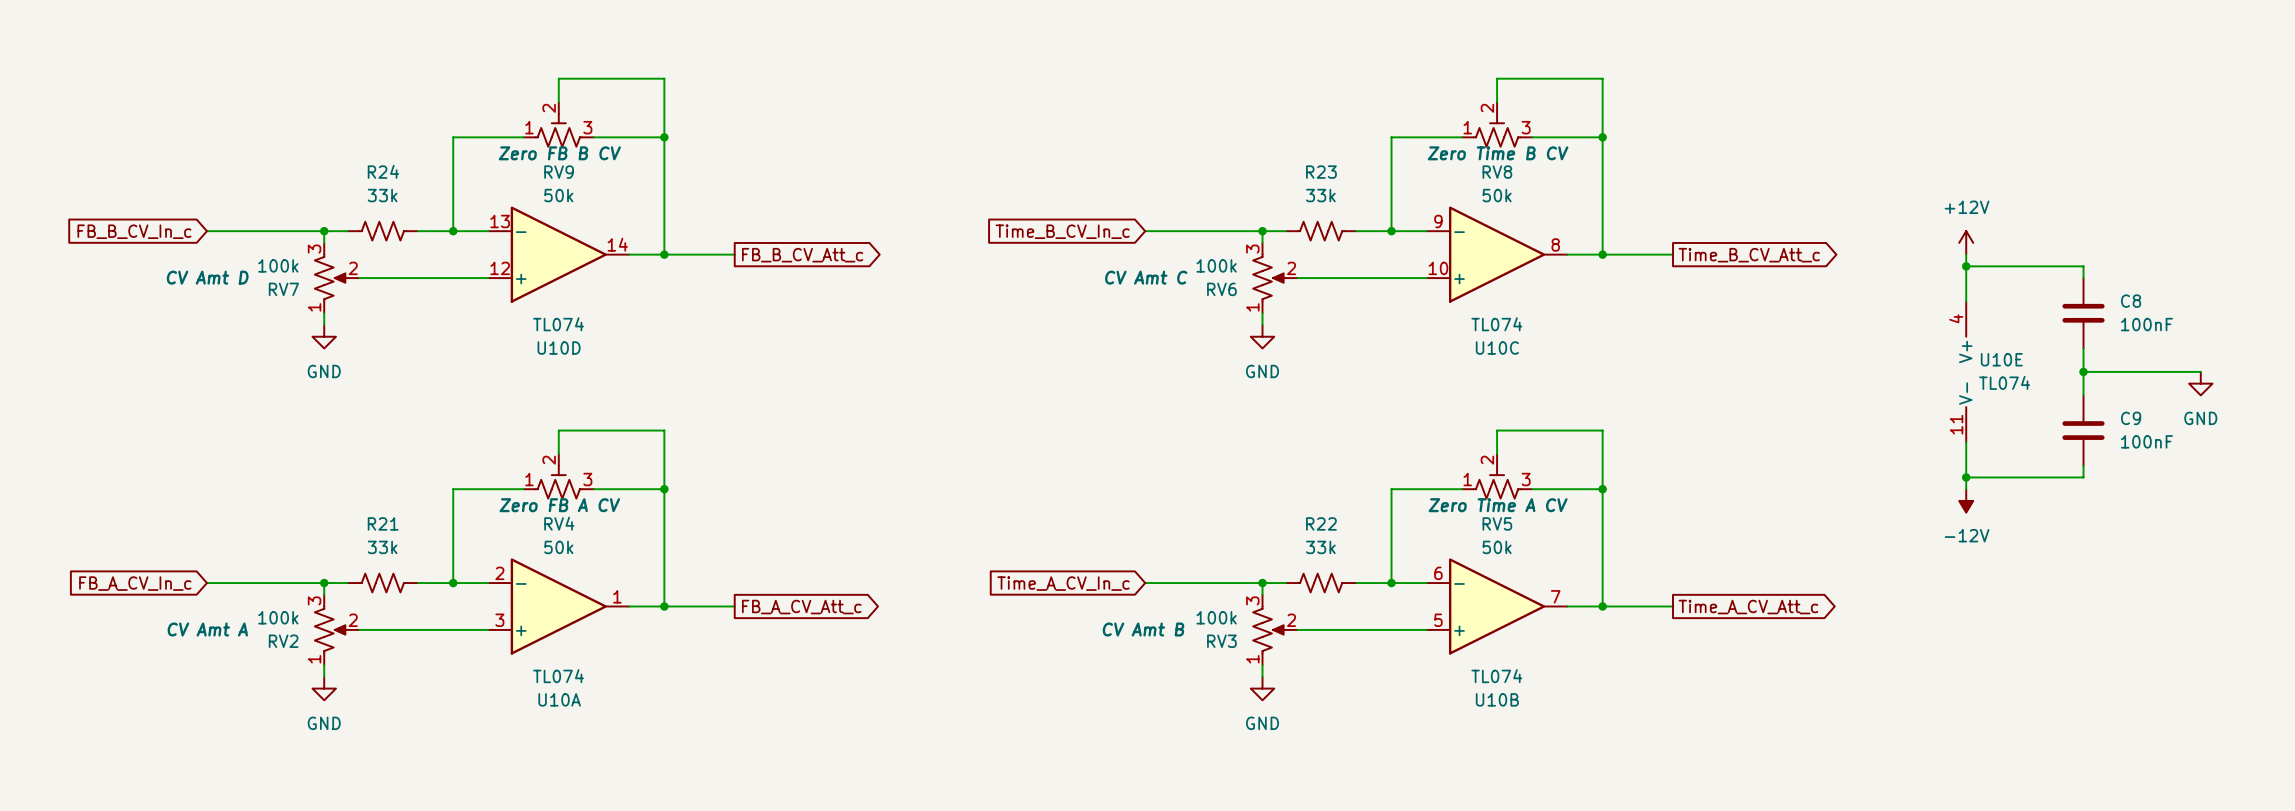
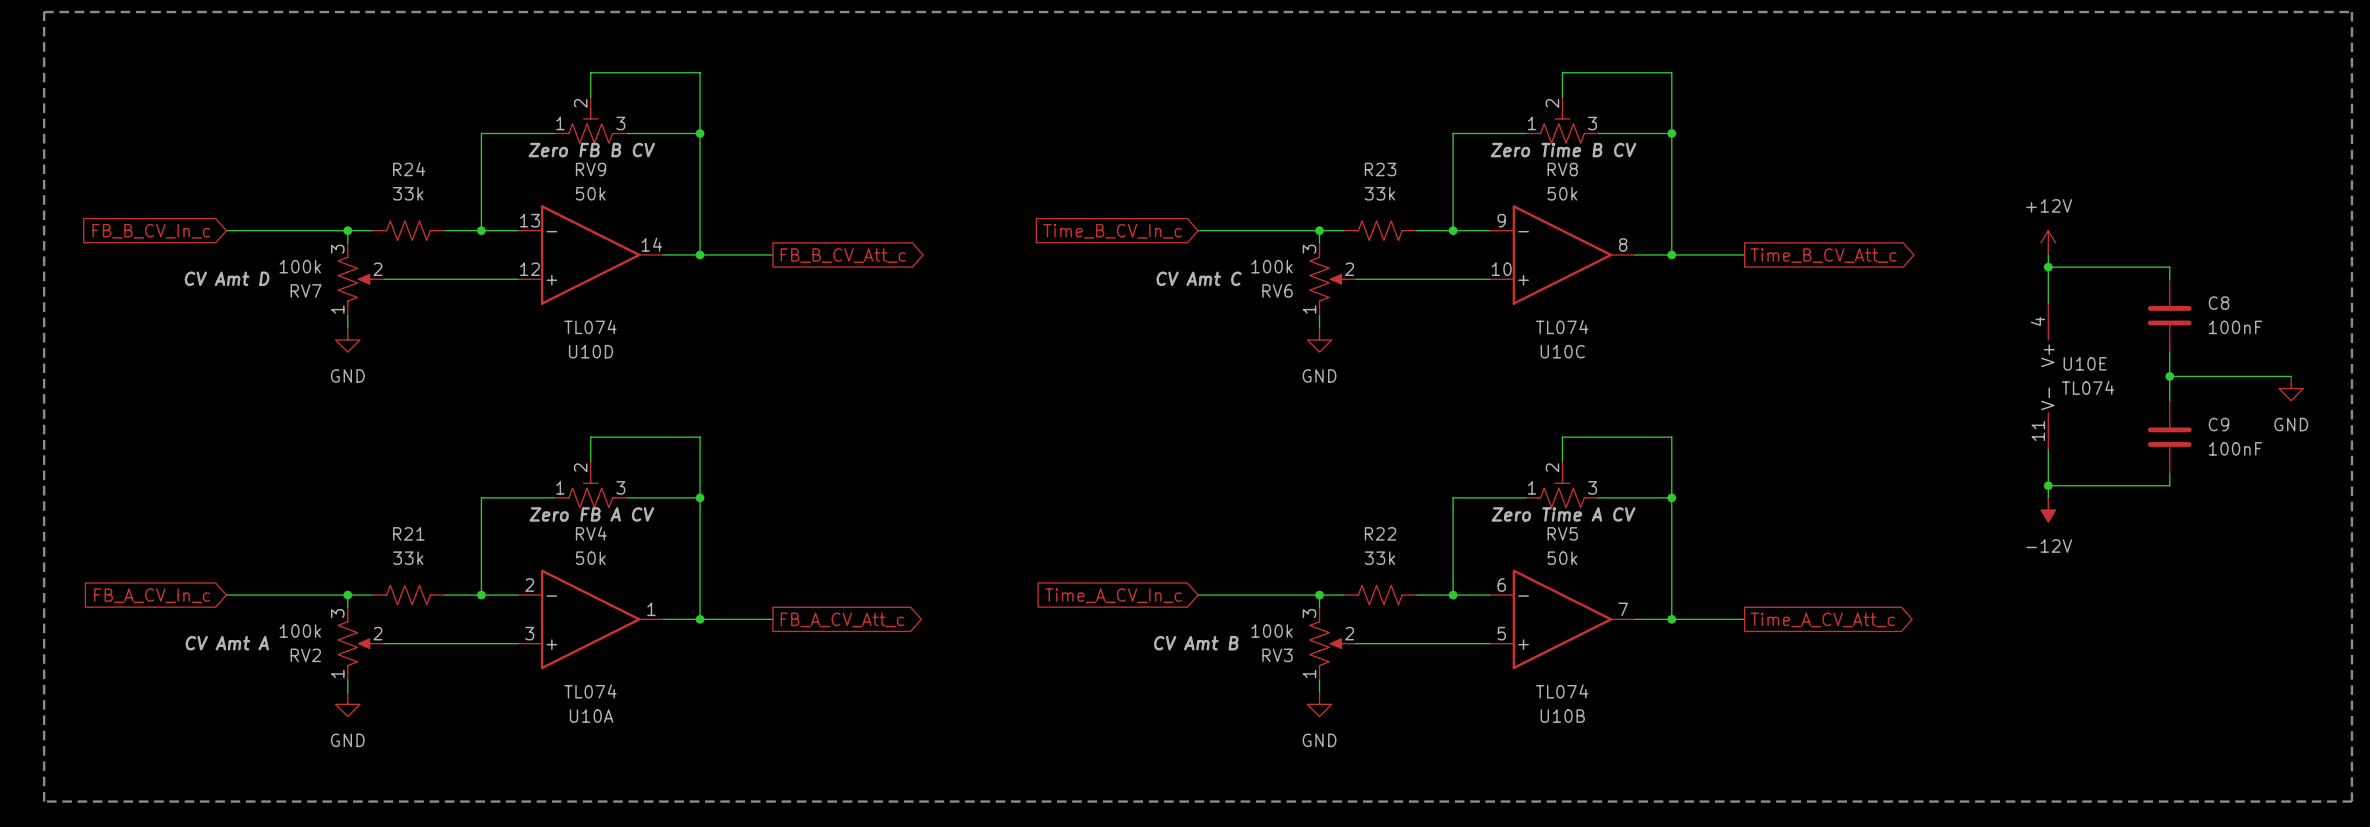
line: none -> (44, 12) (2351, 12) (2351, 801) (44, 801) (44, 12)

